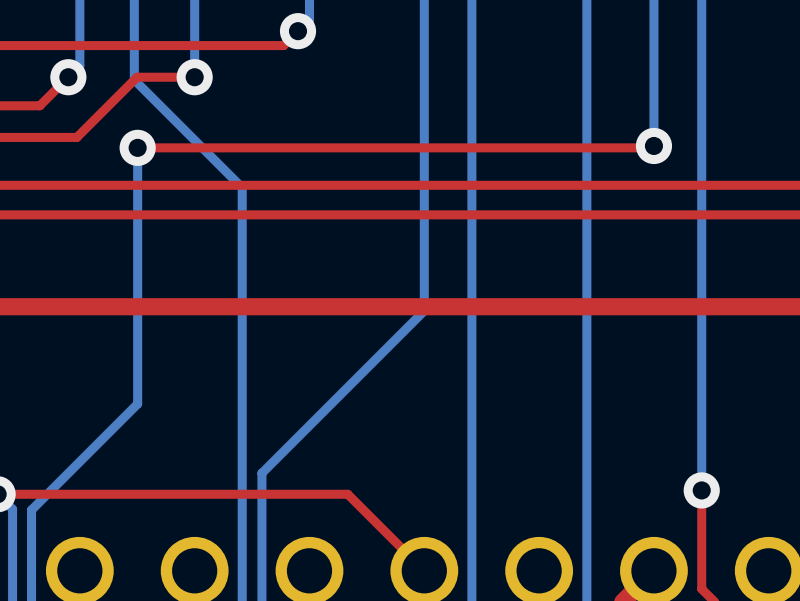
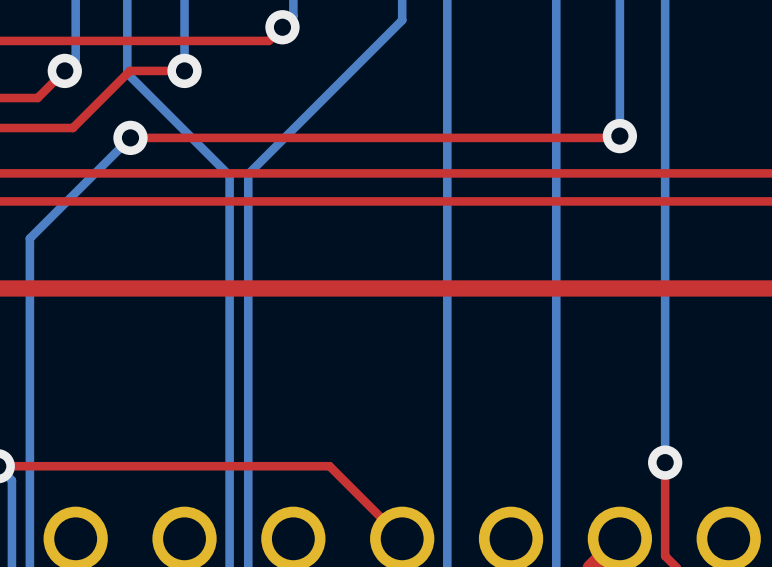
bottom track: (424, 23) (424, 310) (261, 473) -> (402, 20) (248, 174) (248, 446)
bottom track: (137, 147) (137, 403) (31, 510) -> (130, 137) (29, 238) (29, 481)

